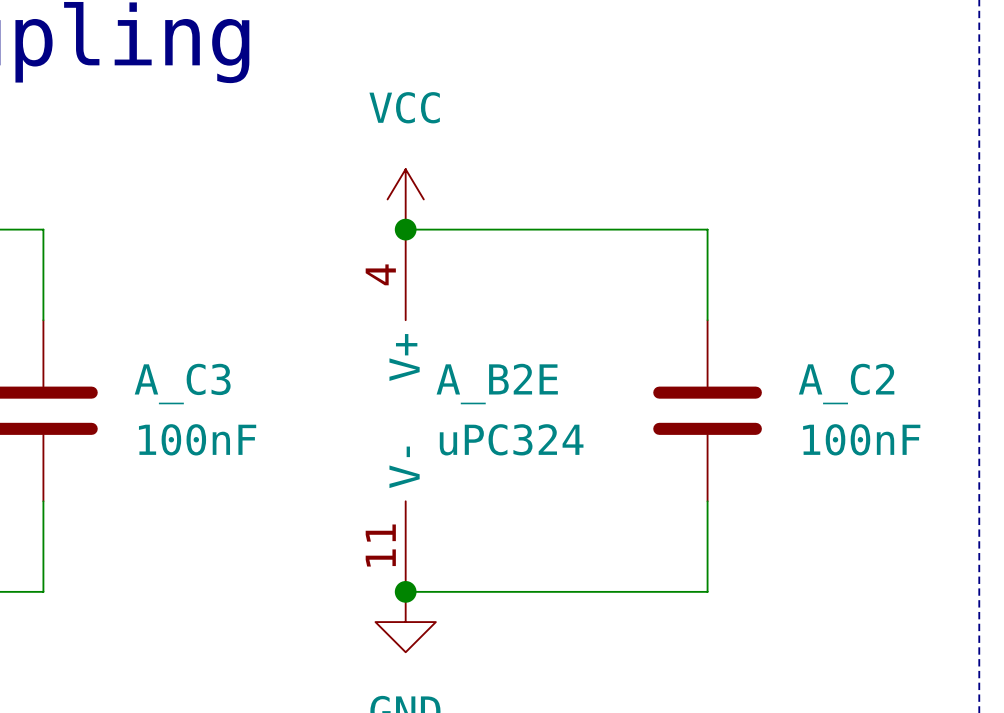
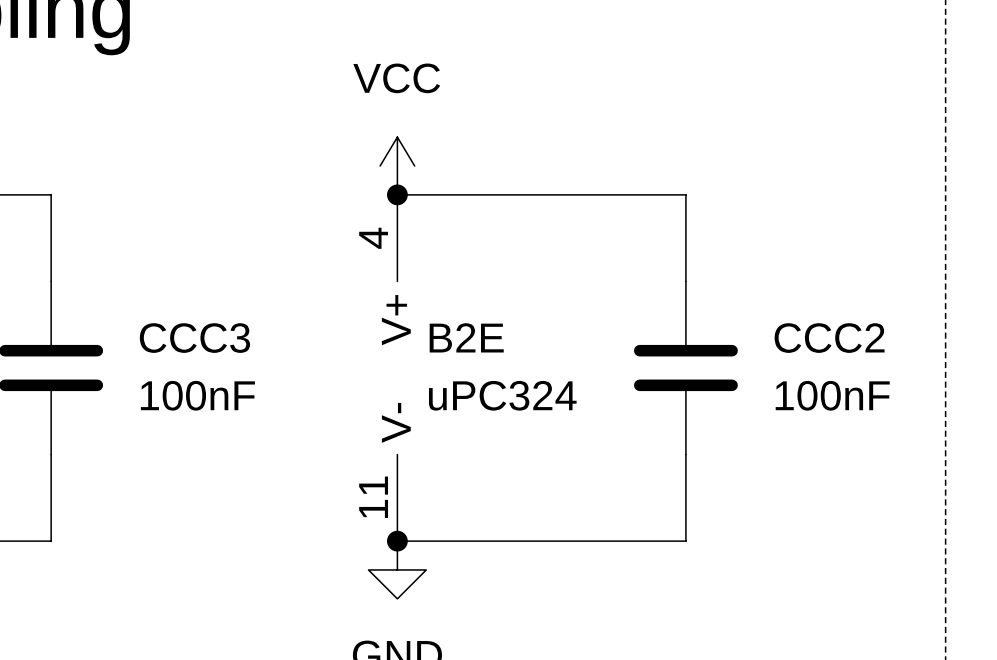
A_C3 name: A_C3 (182, 384) -> CCC3 (194, 338)
A_B2E name: A_B2E (497, 384) -> B2E (466, 337)
A_C2 name: A_C2 (846, 384) -> CCC2 (829, 338)

